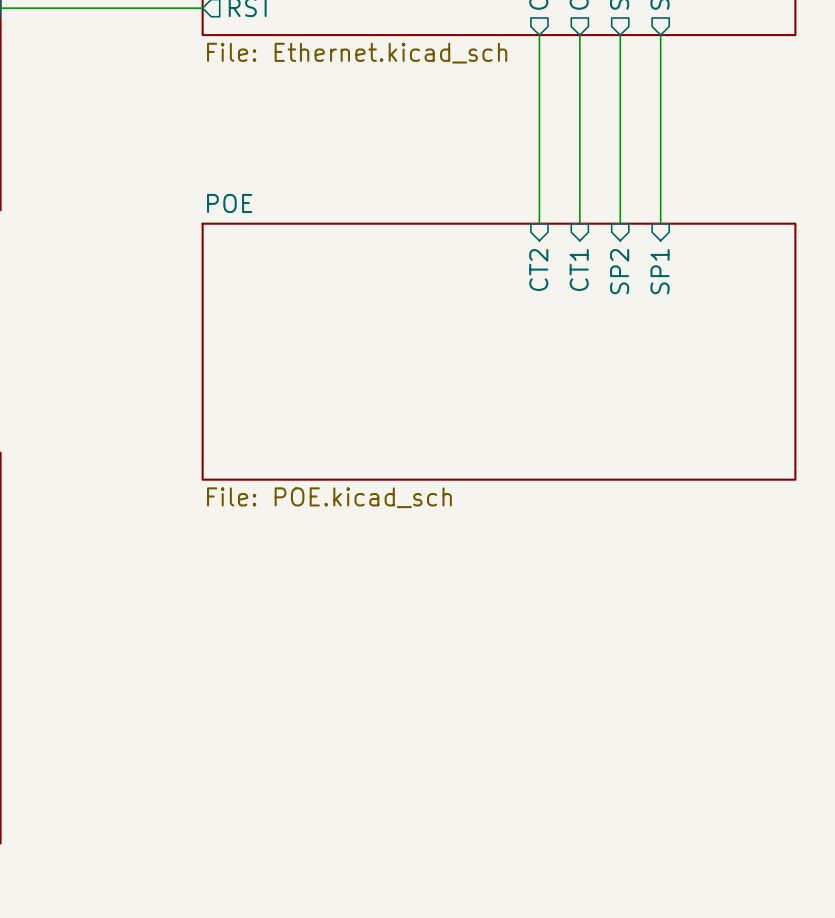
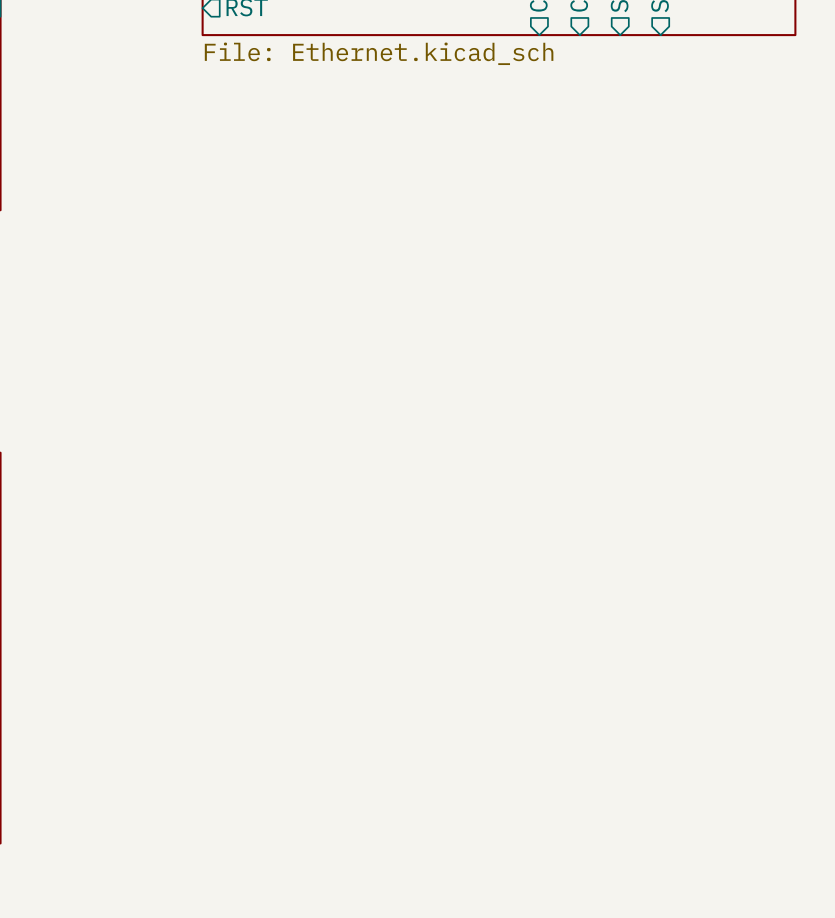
wire: (0, 8) (202, 8) -> none
wire: (539, 35) (539, 223) -> none
wire: (579, 35) (579, 223) -> none
wire: (620, 35) (620, 223) -> none
wire: (660, 35) (660, 223) -> none
sheet pin: CT2 (538, 269) -> none
sheet pin: CT1 (579, 269) -> none
sheet pin: SP2 (619, 271) -> none
sheet pin: SP1 (660, 271) -> none
sheet POE: File: POE.kicad_sch (499, 351) -> none

